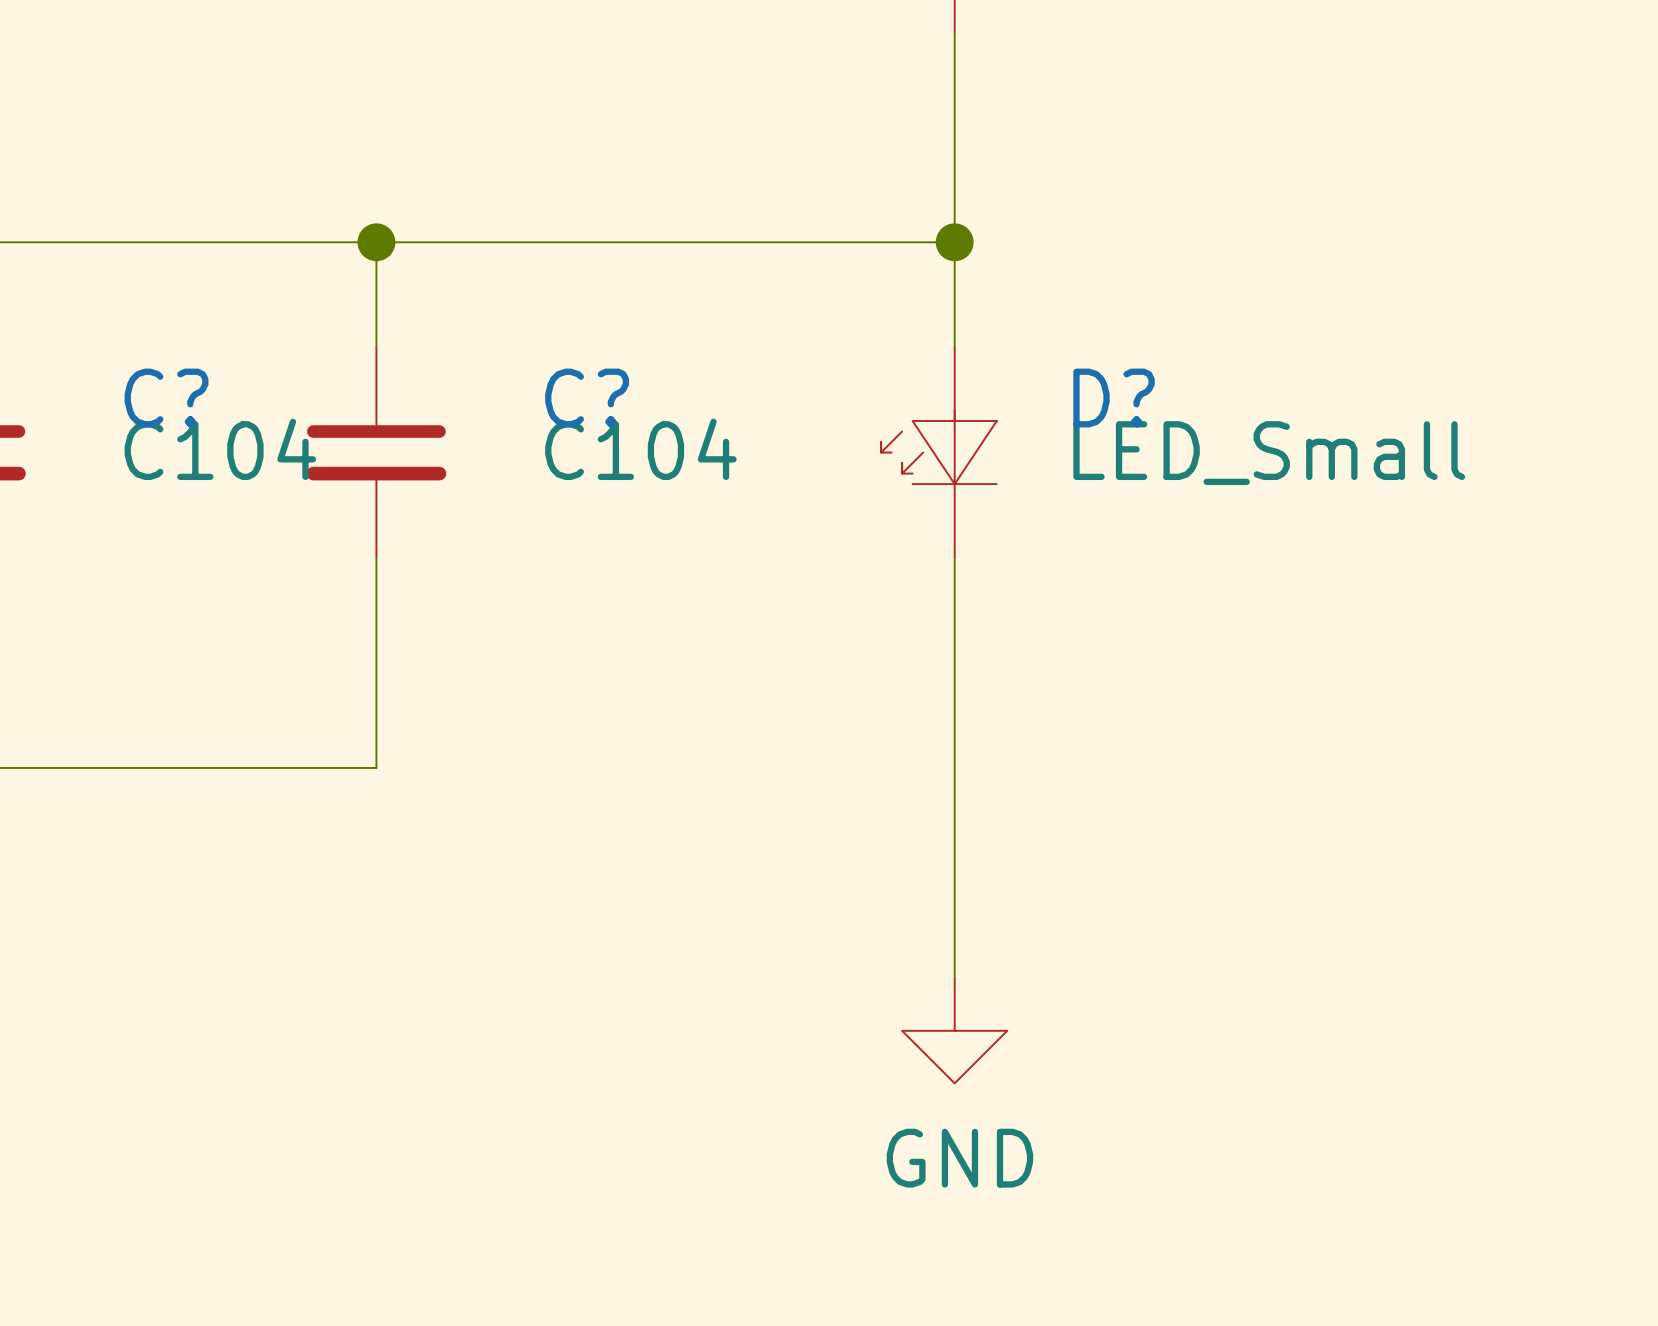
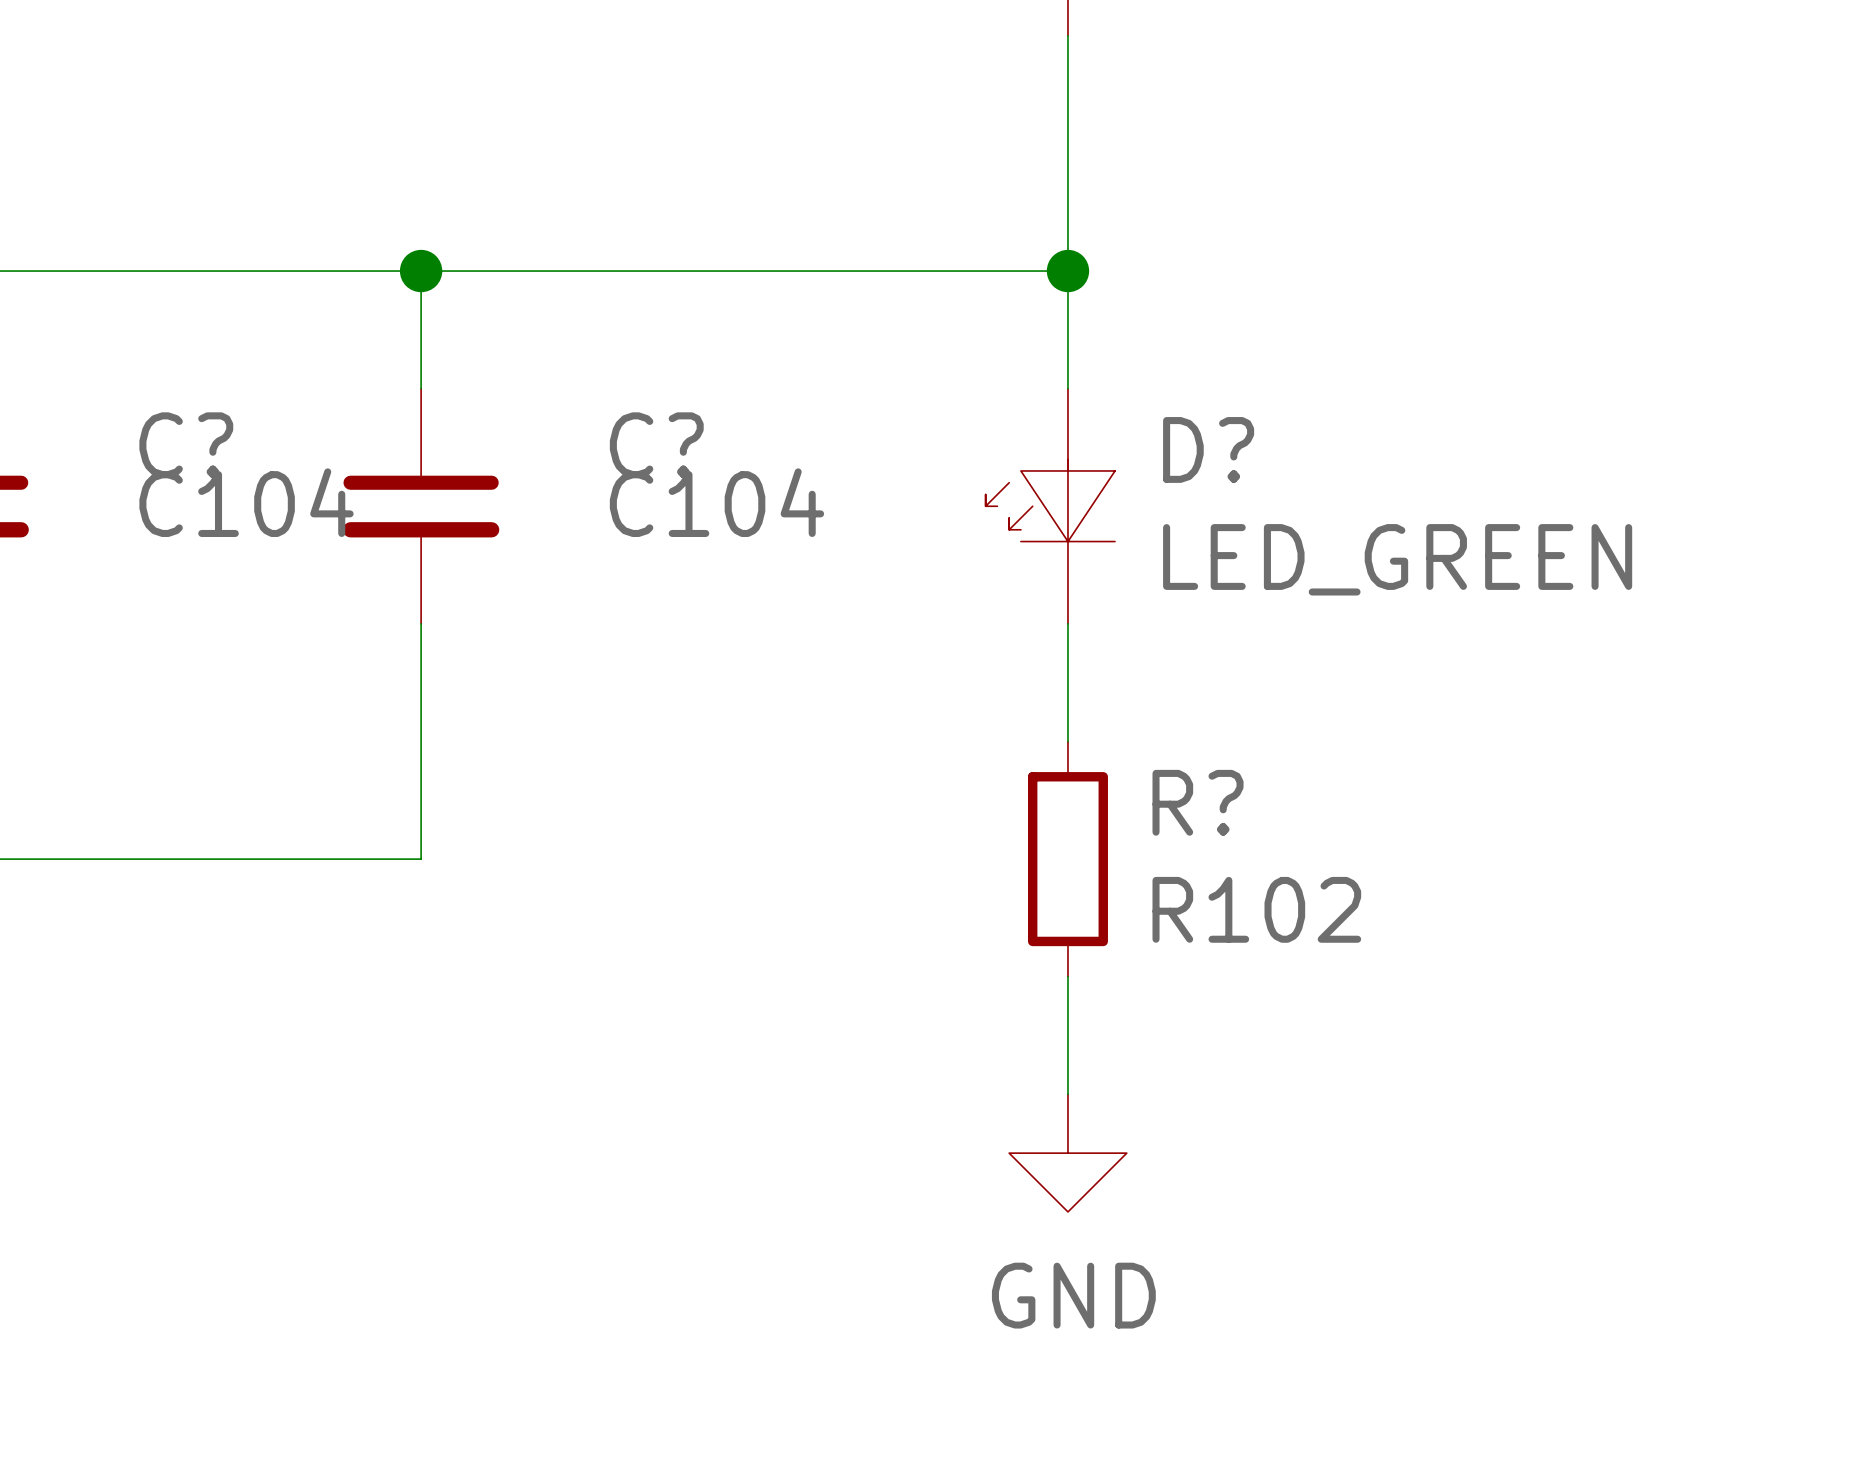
D? name position: D? (1114, 398) -> D? (1208, 449)
D? value: LED_Small (1269, 453) -> LED_GREEN (1397, 559)
wire: (954, 662) (954, 873) -> none
R?: none -> R102 (1067, 859)

